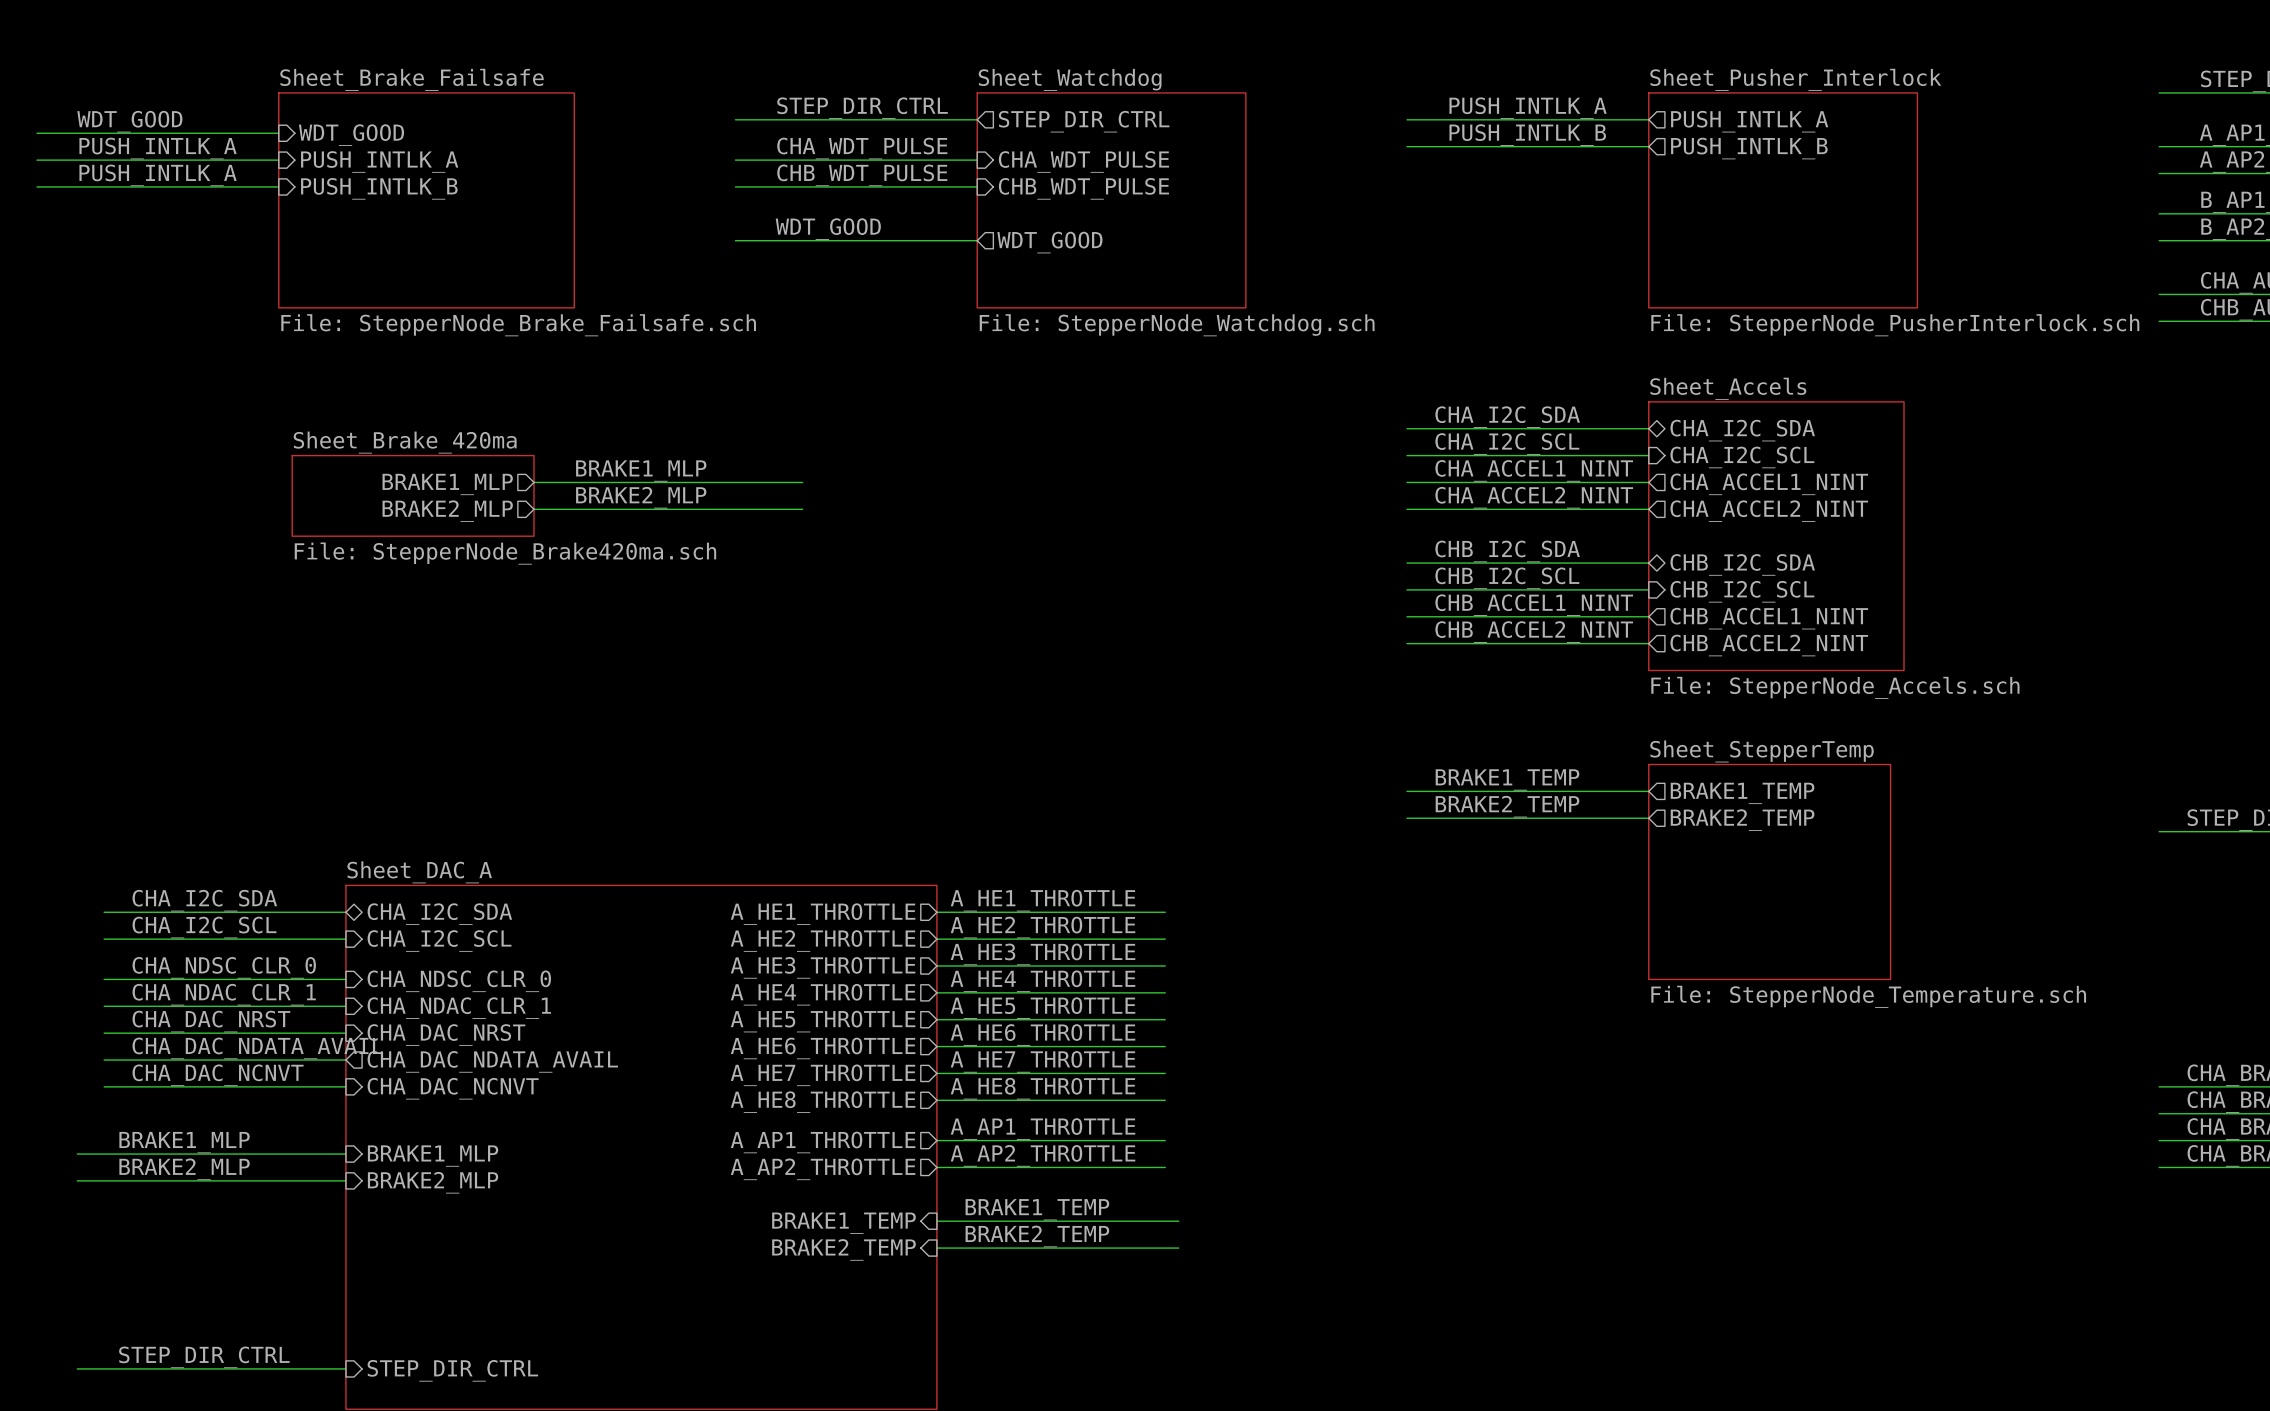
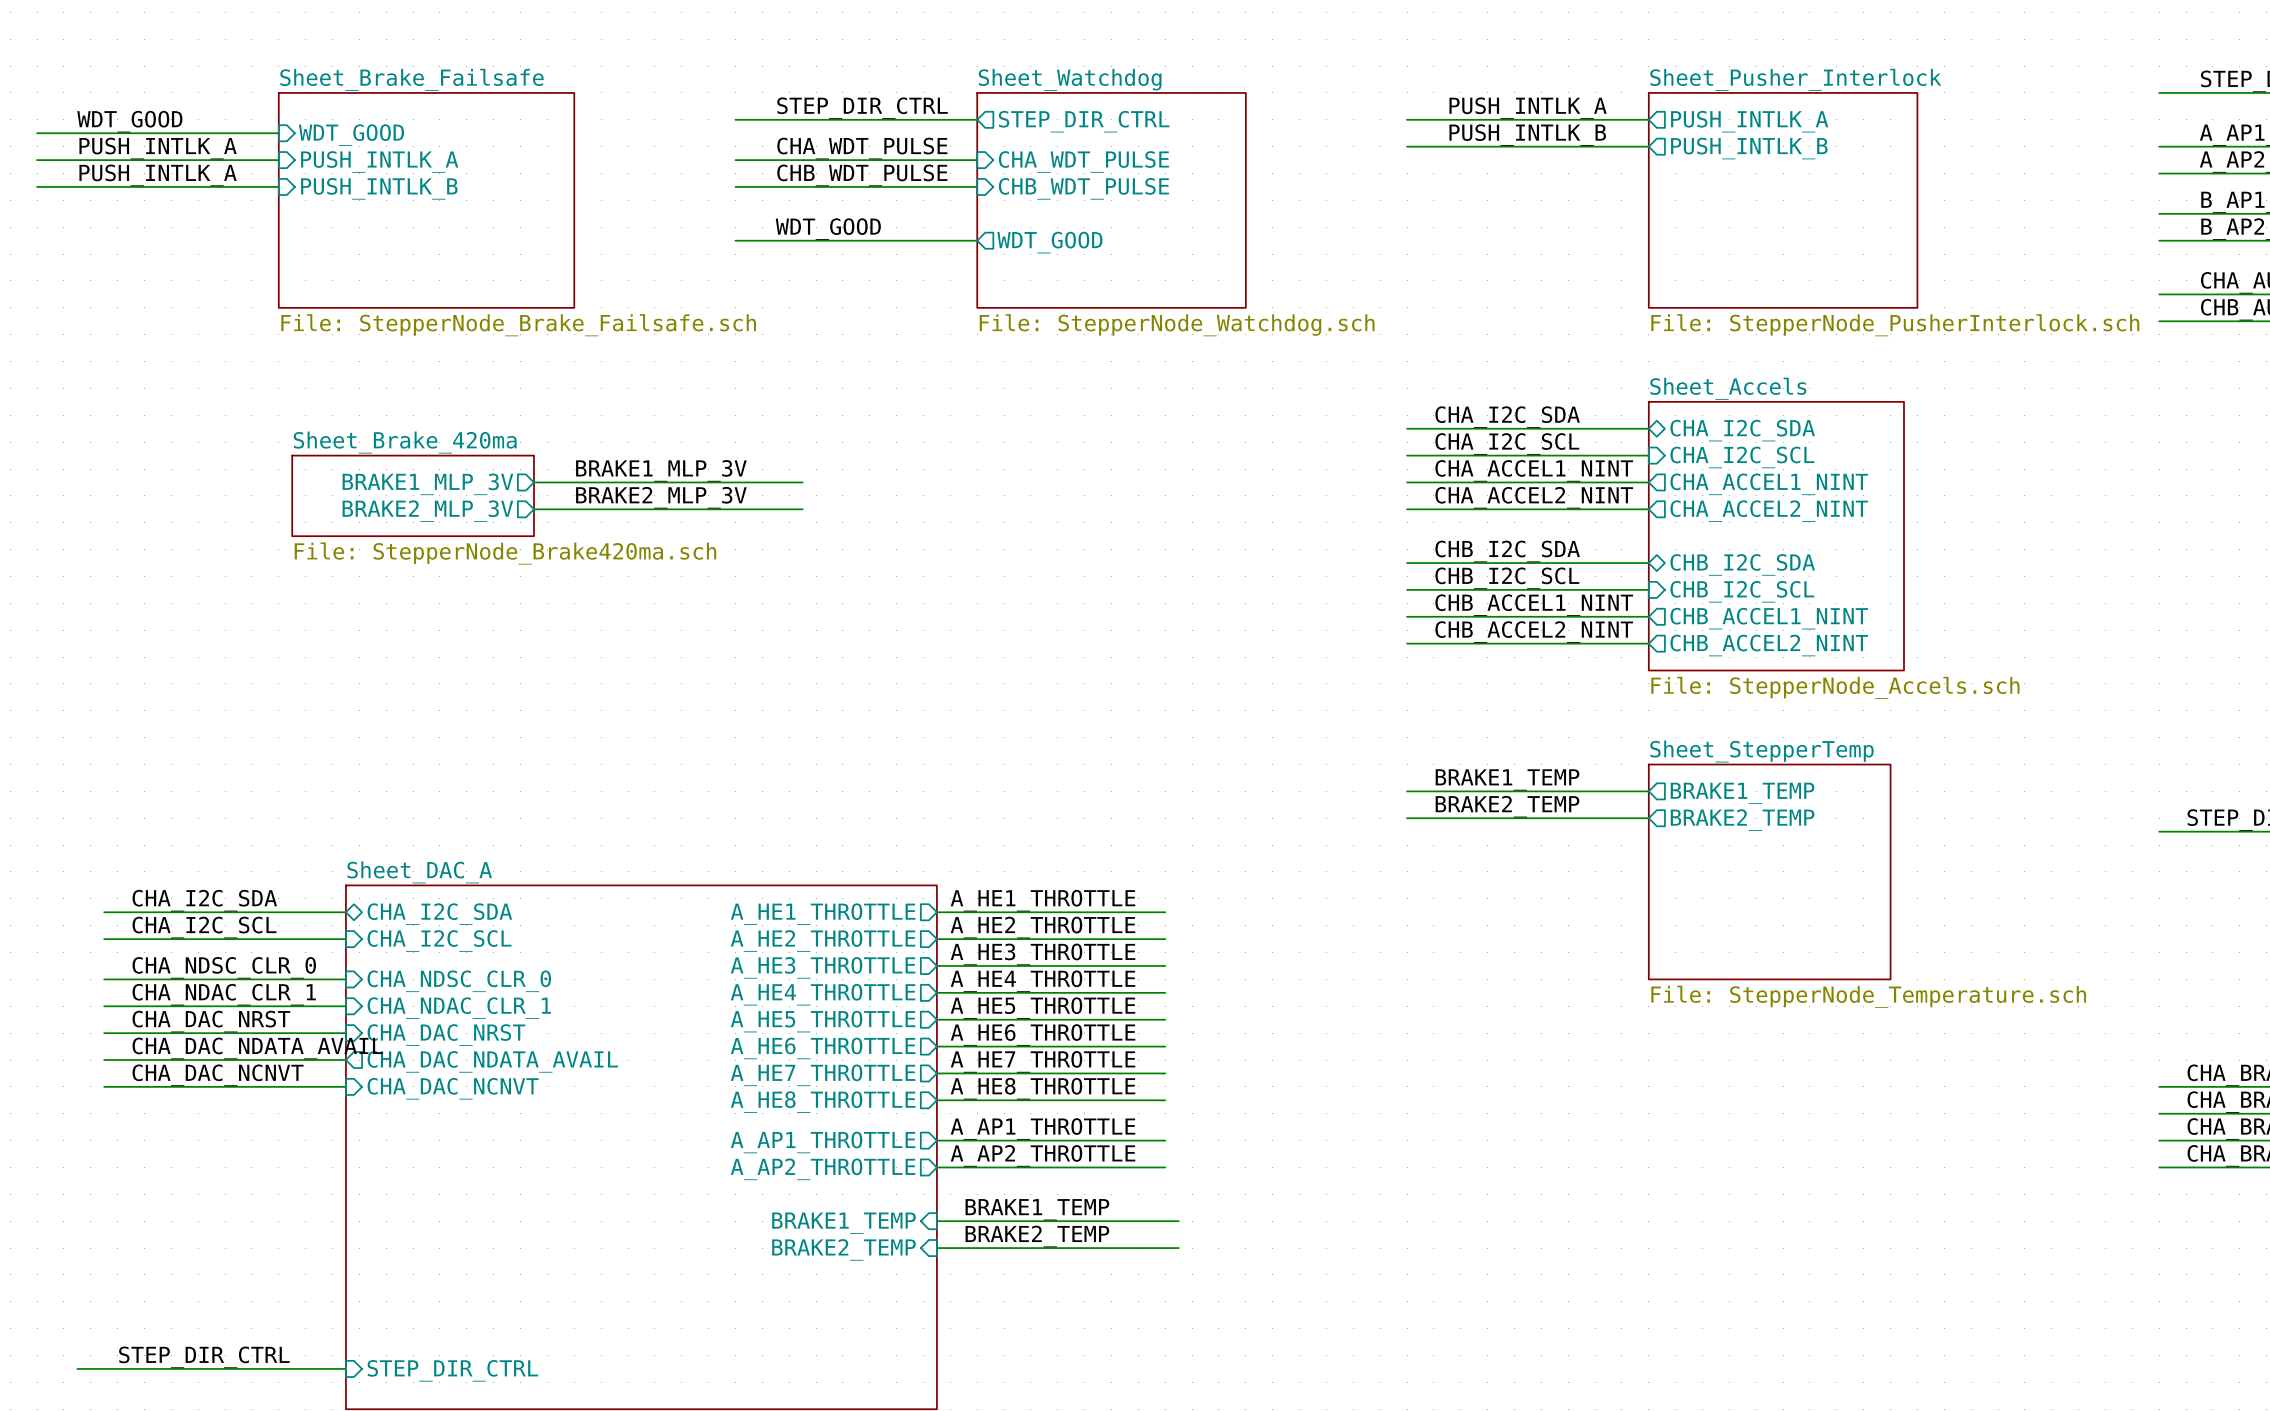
label: BRAKE1_MLP (641, 471) -> BRAKE1_MLP_3V (661, 470)
sheet pin: BRAKE1_MLP (447, 484) -> BRAKE1_MLP_3V (427, 484)
label: BRAKE2_MLP (641, 497) -> BRAKE2_MLP_3V (661, 497)
sheet pin: BRAKE2_MLP (447, 511) -> BRAKE2_MLP_3V (427, 511)
label: BRAKE1_MLP (184, 1142) -> none
wire: (77, 1154) (345, 1154) -> none
sheet pin: BRAKE1_MLP (433, 1156) -> none
label: BRAKE2_MLP (184, 1169) -> none
wire: (77, 1180) (345, 1180) -> none
sheet pin: BRAKE2_MLP (433, 1182) -> none

